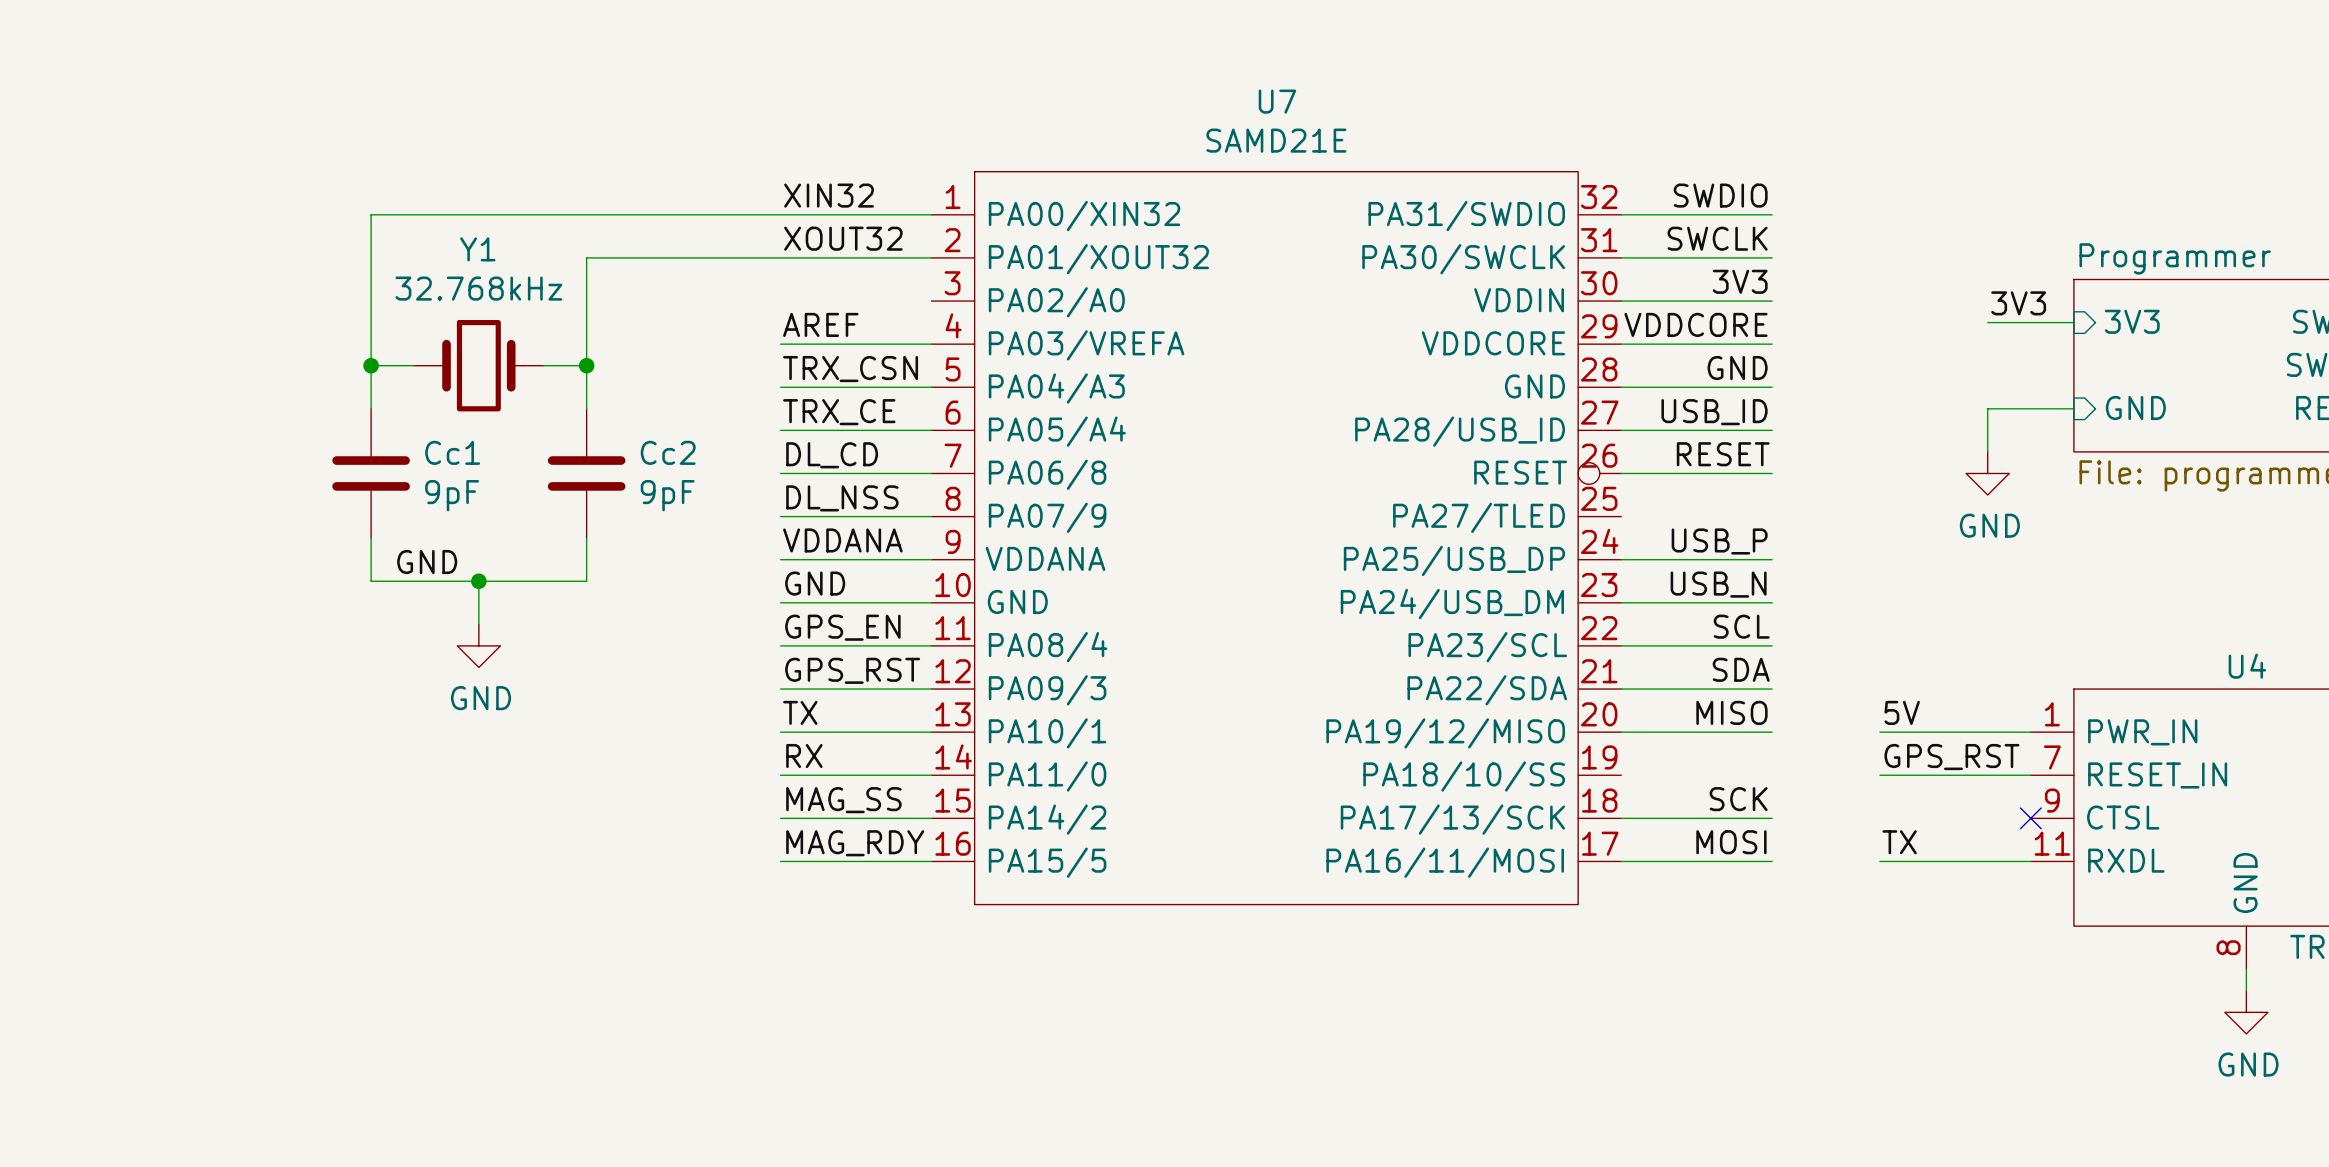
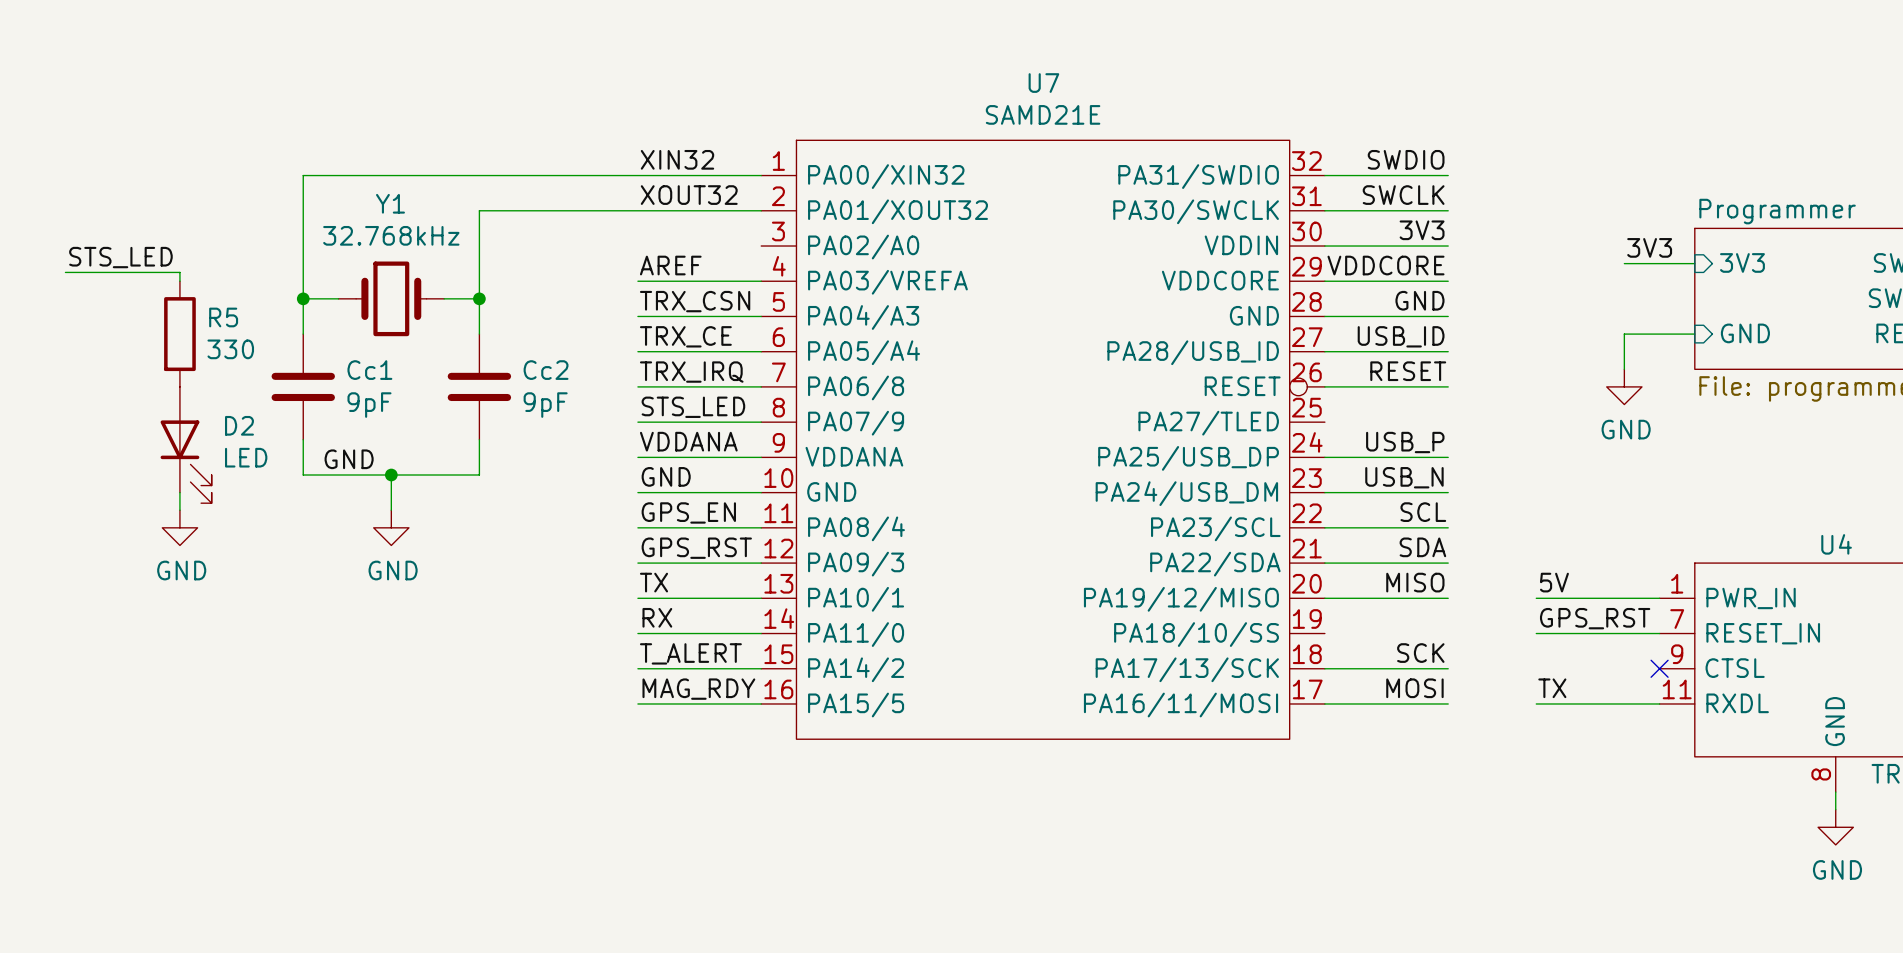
label: none -> STS_LED (120, 257)
wire: none -> (65, 272) (179, 272) (179, 281)
R5: none -> 330 (179, 334)
label: DL_CD (832, 455) -> TRX_IRQ (691, 372)
label: DL_NSS (842, 498) -> STS_LED (693, 407)
D2: none -> LED (186, 445)
wire: none -> (179, 492) (179, 510)
power symbol: none -> GND (179, 527)
label: MAG_SS (843, 800) -> T_ALERT (690, 653)

